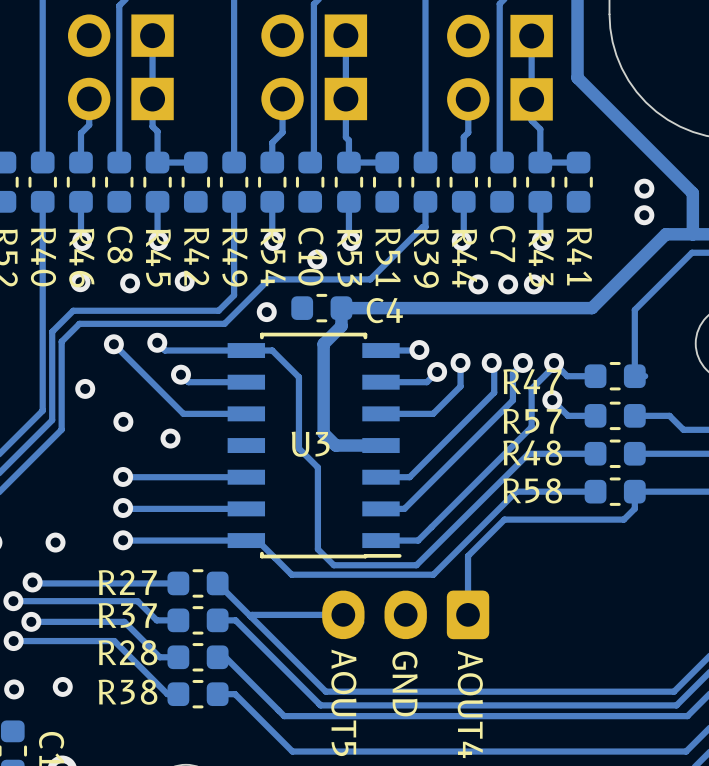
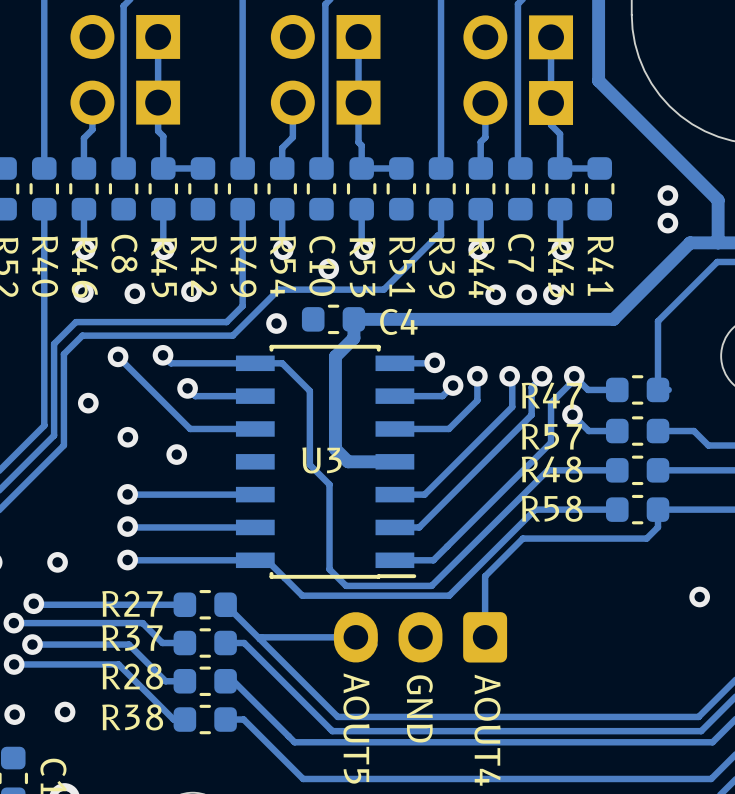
via: none -> (699, 597)

